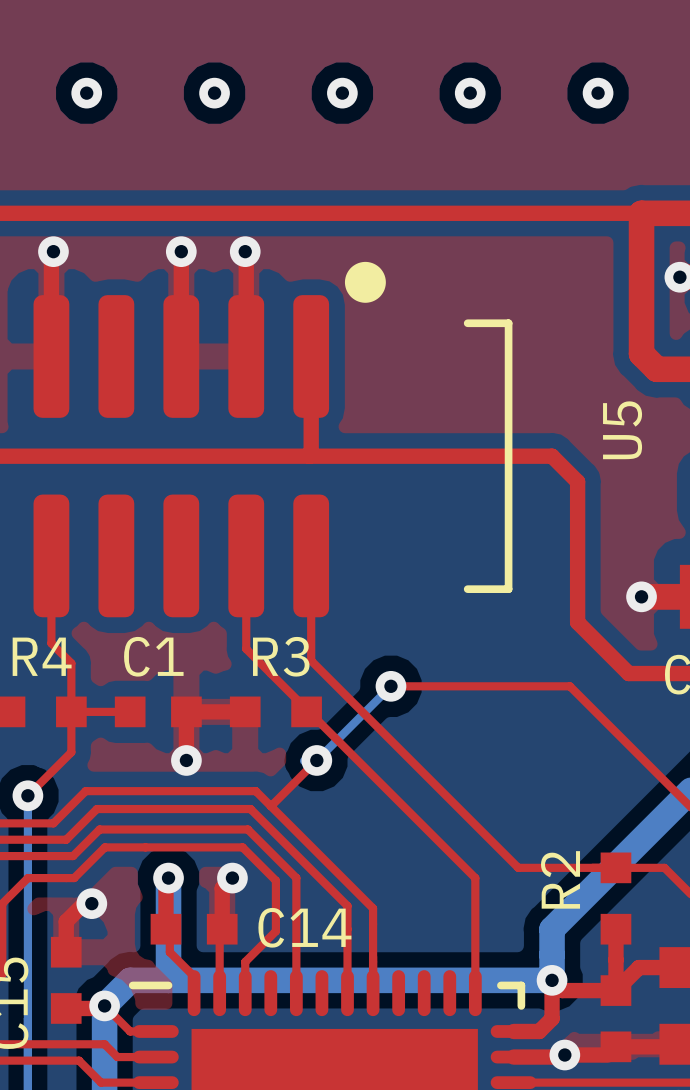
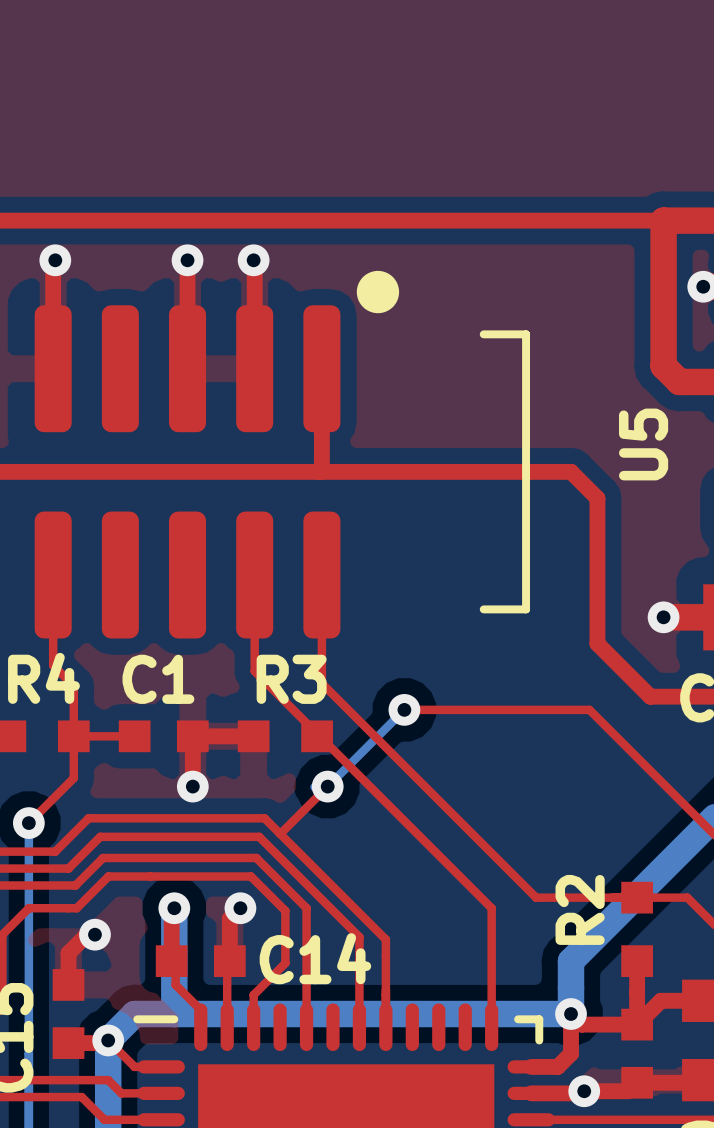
via: (86, 93) -> none
via: (214, 93) -> none
via: (342, 93) -> none
via: (470, 93) -> none
via: (598, 93) -> none

